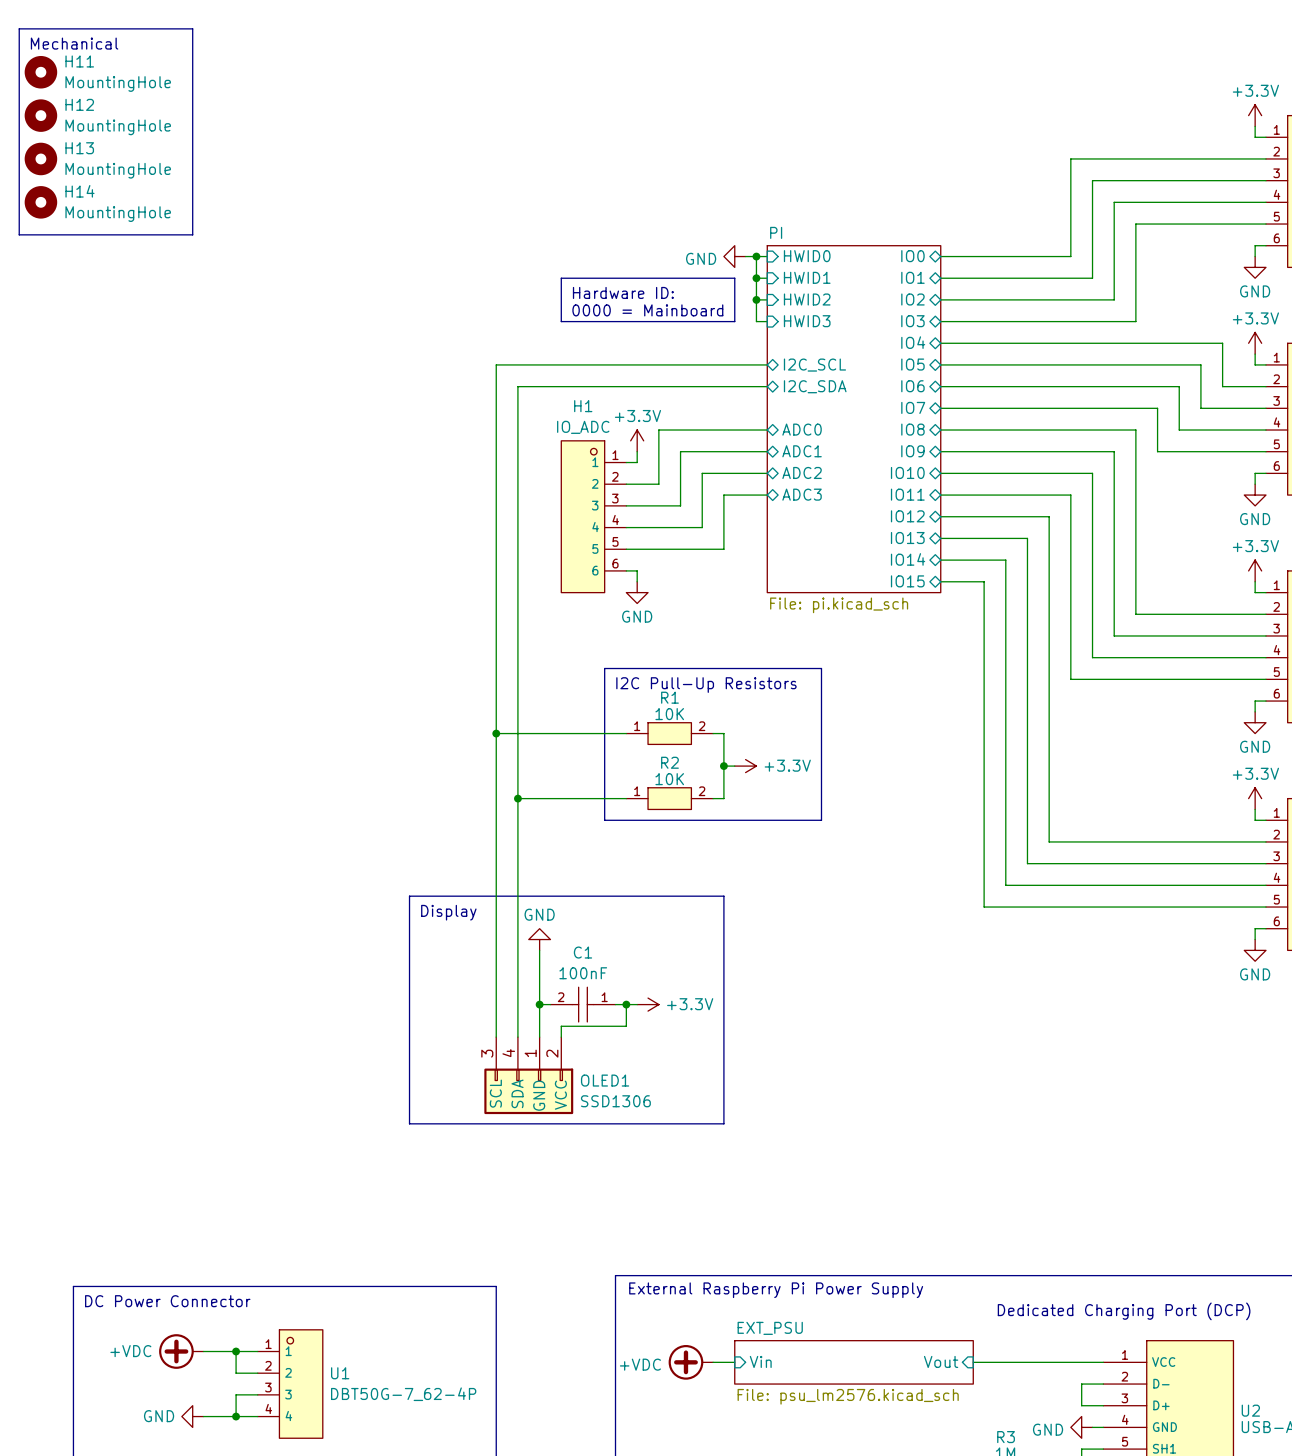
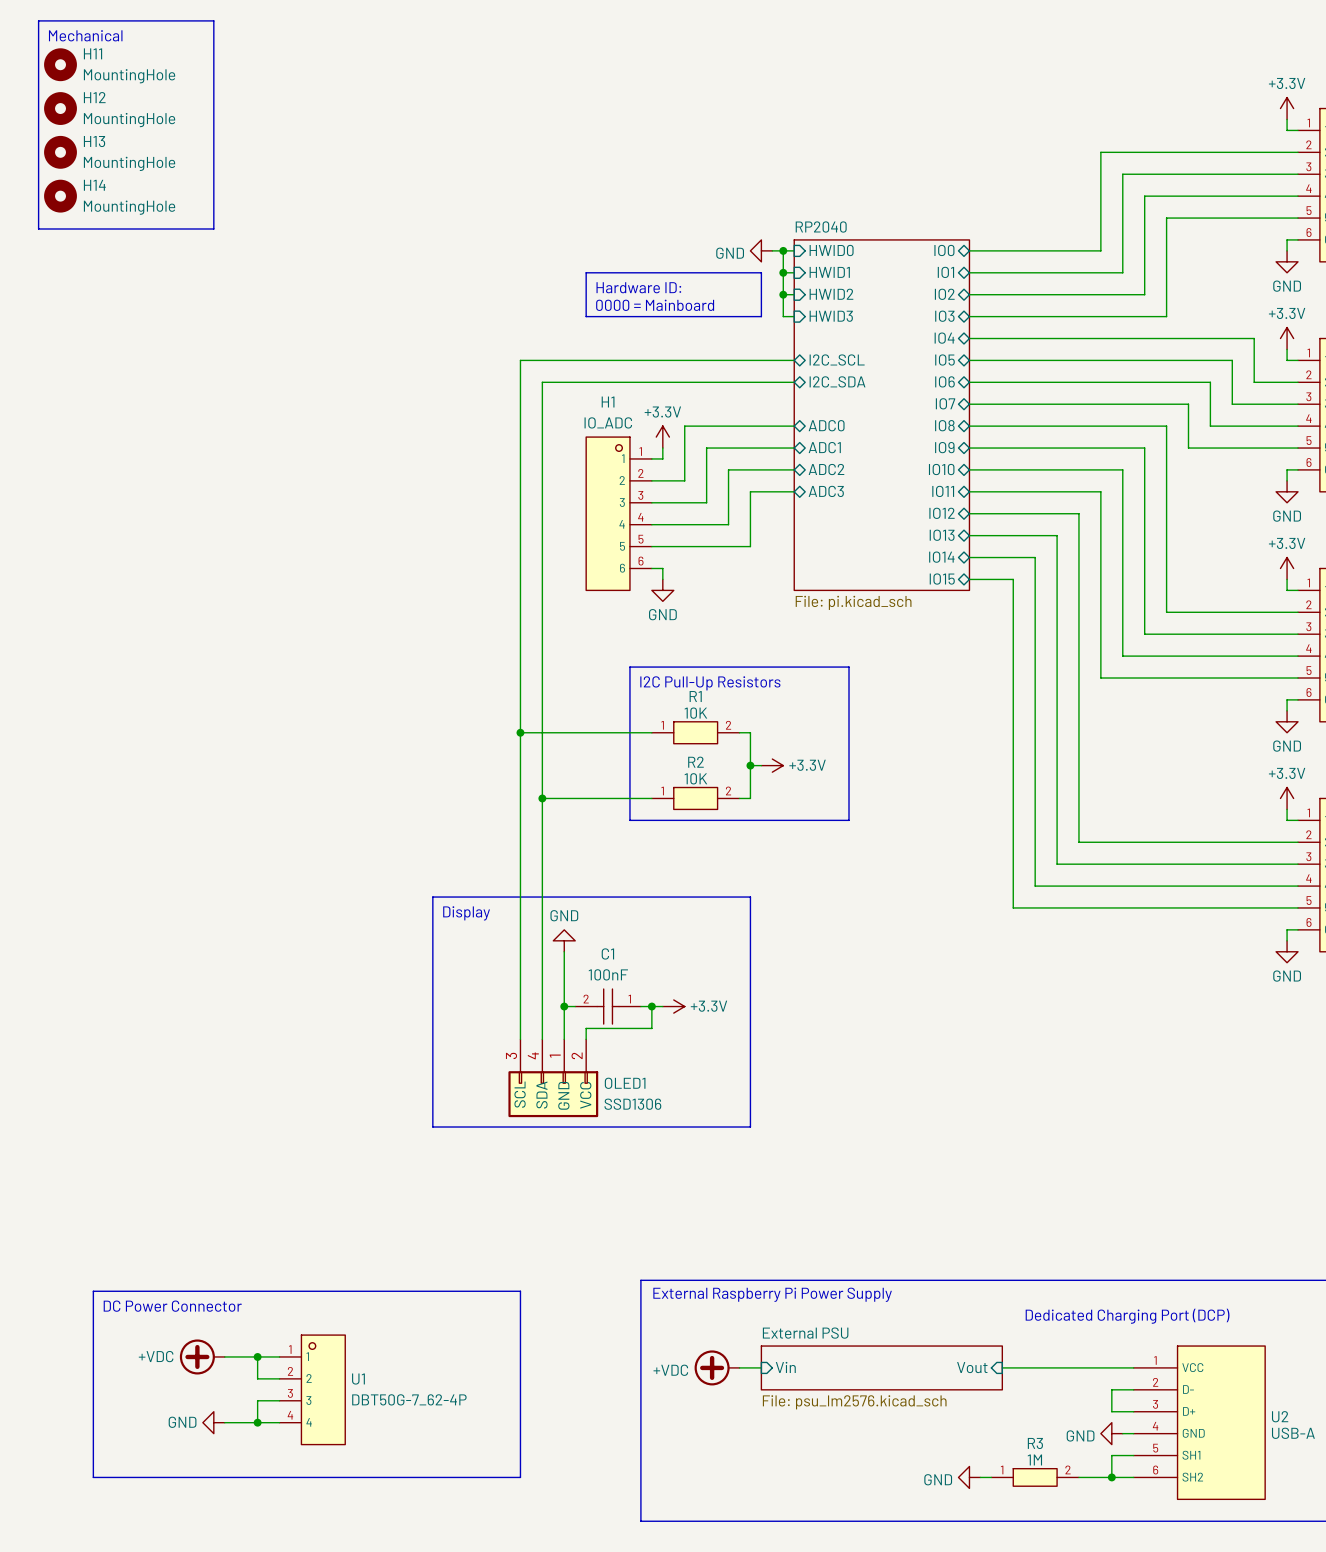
sheet PI name: PI (776, 232) -> RP2040 (821, 227)
sheet EXT_PSU name: EXT_PSU (770, 1328) -> External PSU (805, 1333)

